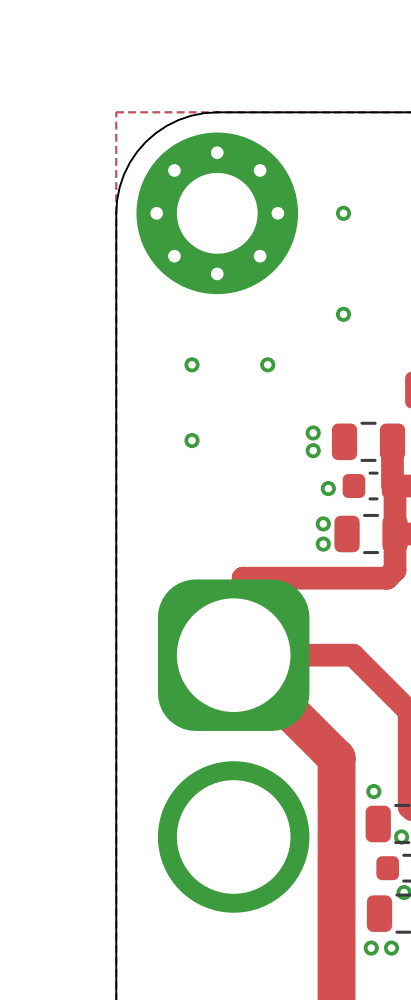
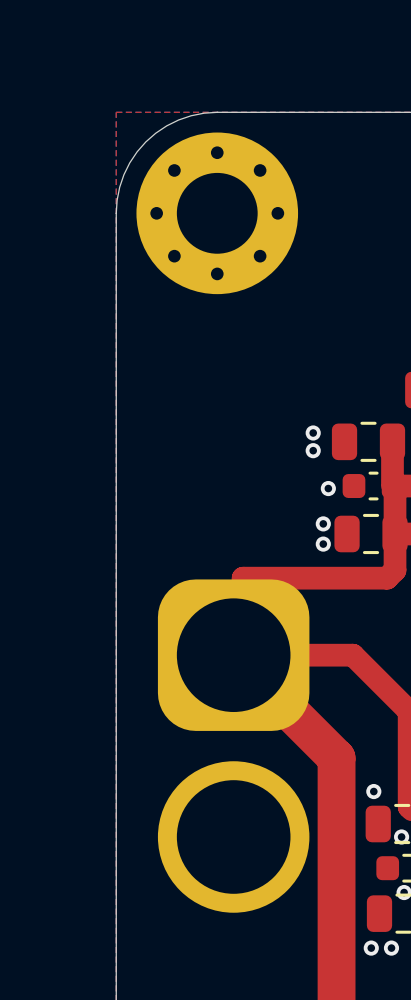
via: (343, 213) -> none
via: (343, 314) -> none
via: (192, 364) -> none
via: (267, 364) -> none
via: (192, 440) -> none

